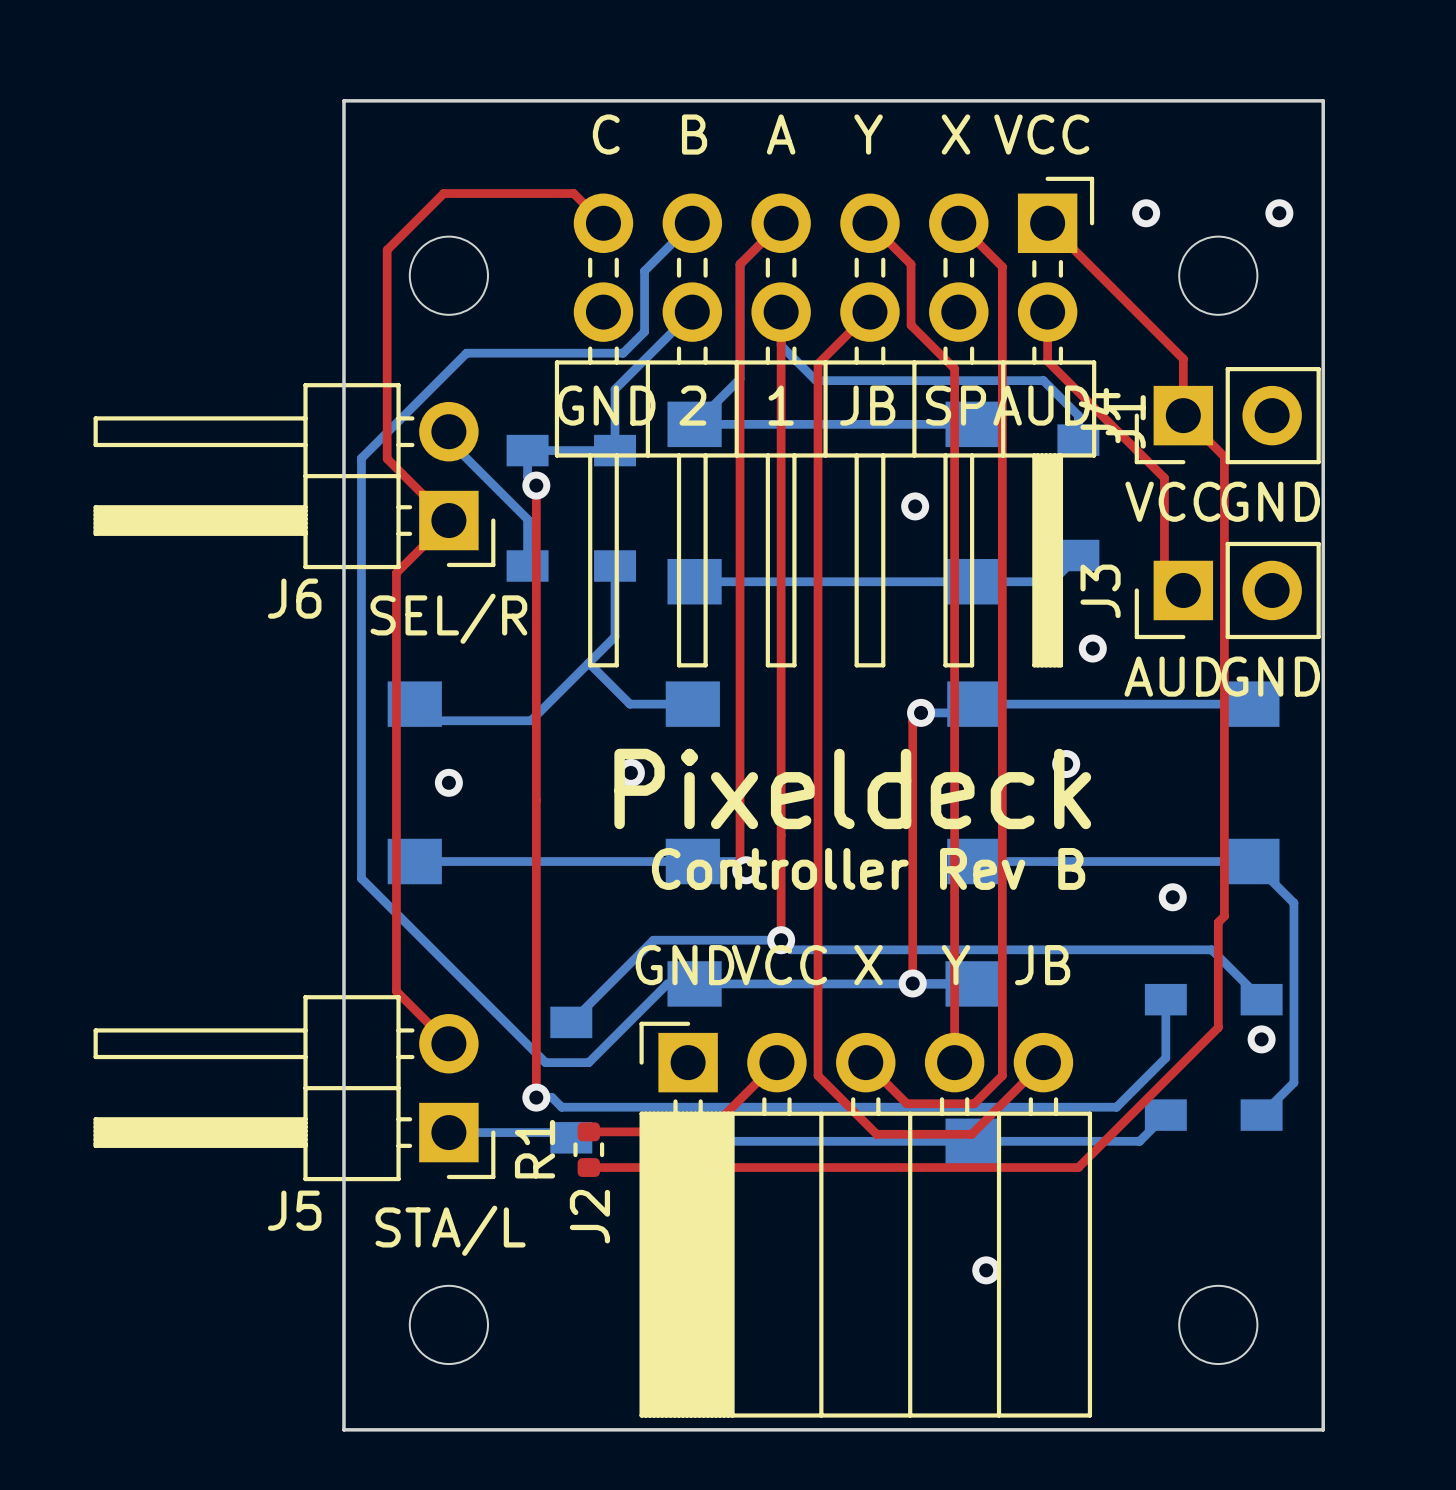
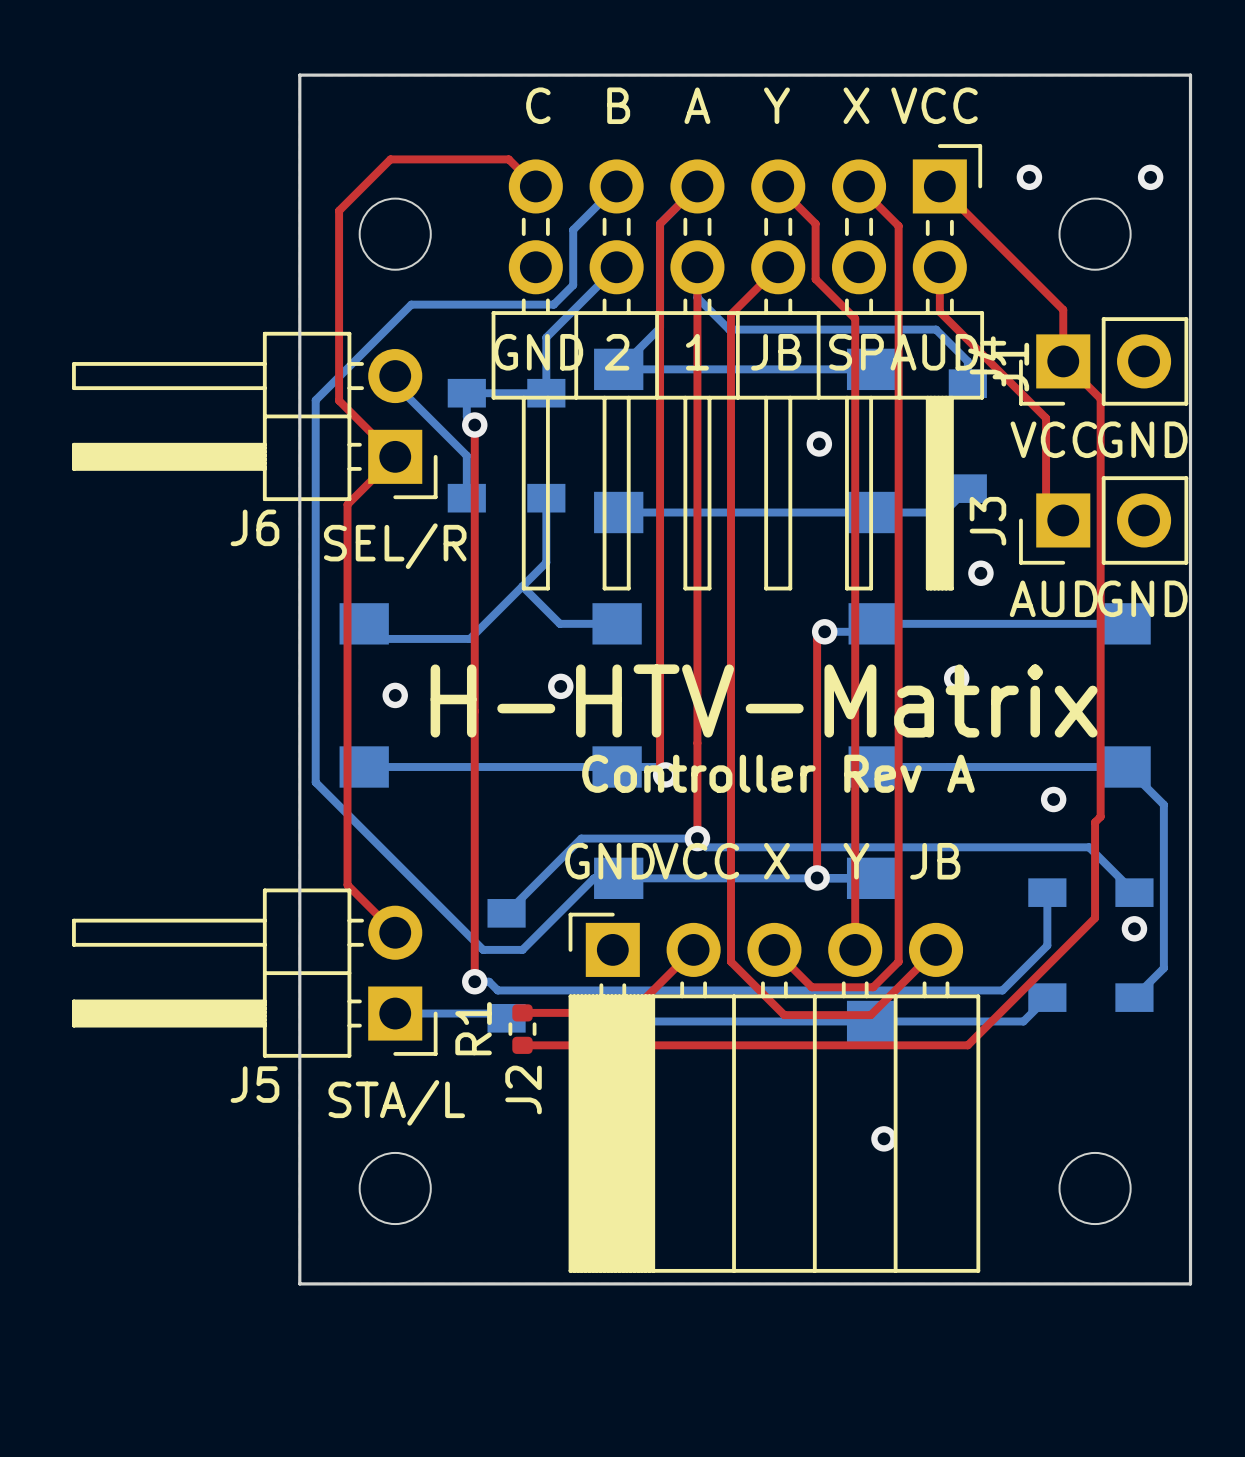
text: Pixeldeck (852, 788) -> H-HTV-Matrix (764, 701)
text: Controller Rev B (868, 868) -> Controller Rev A (778, 773)

